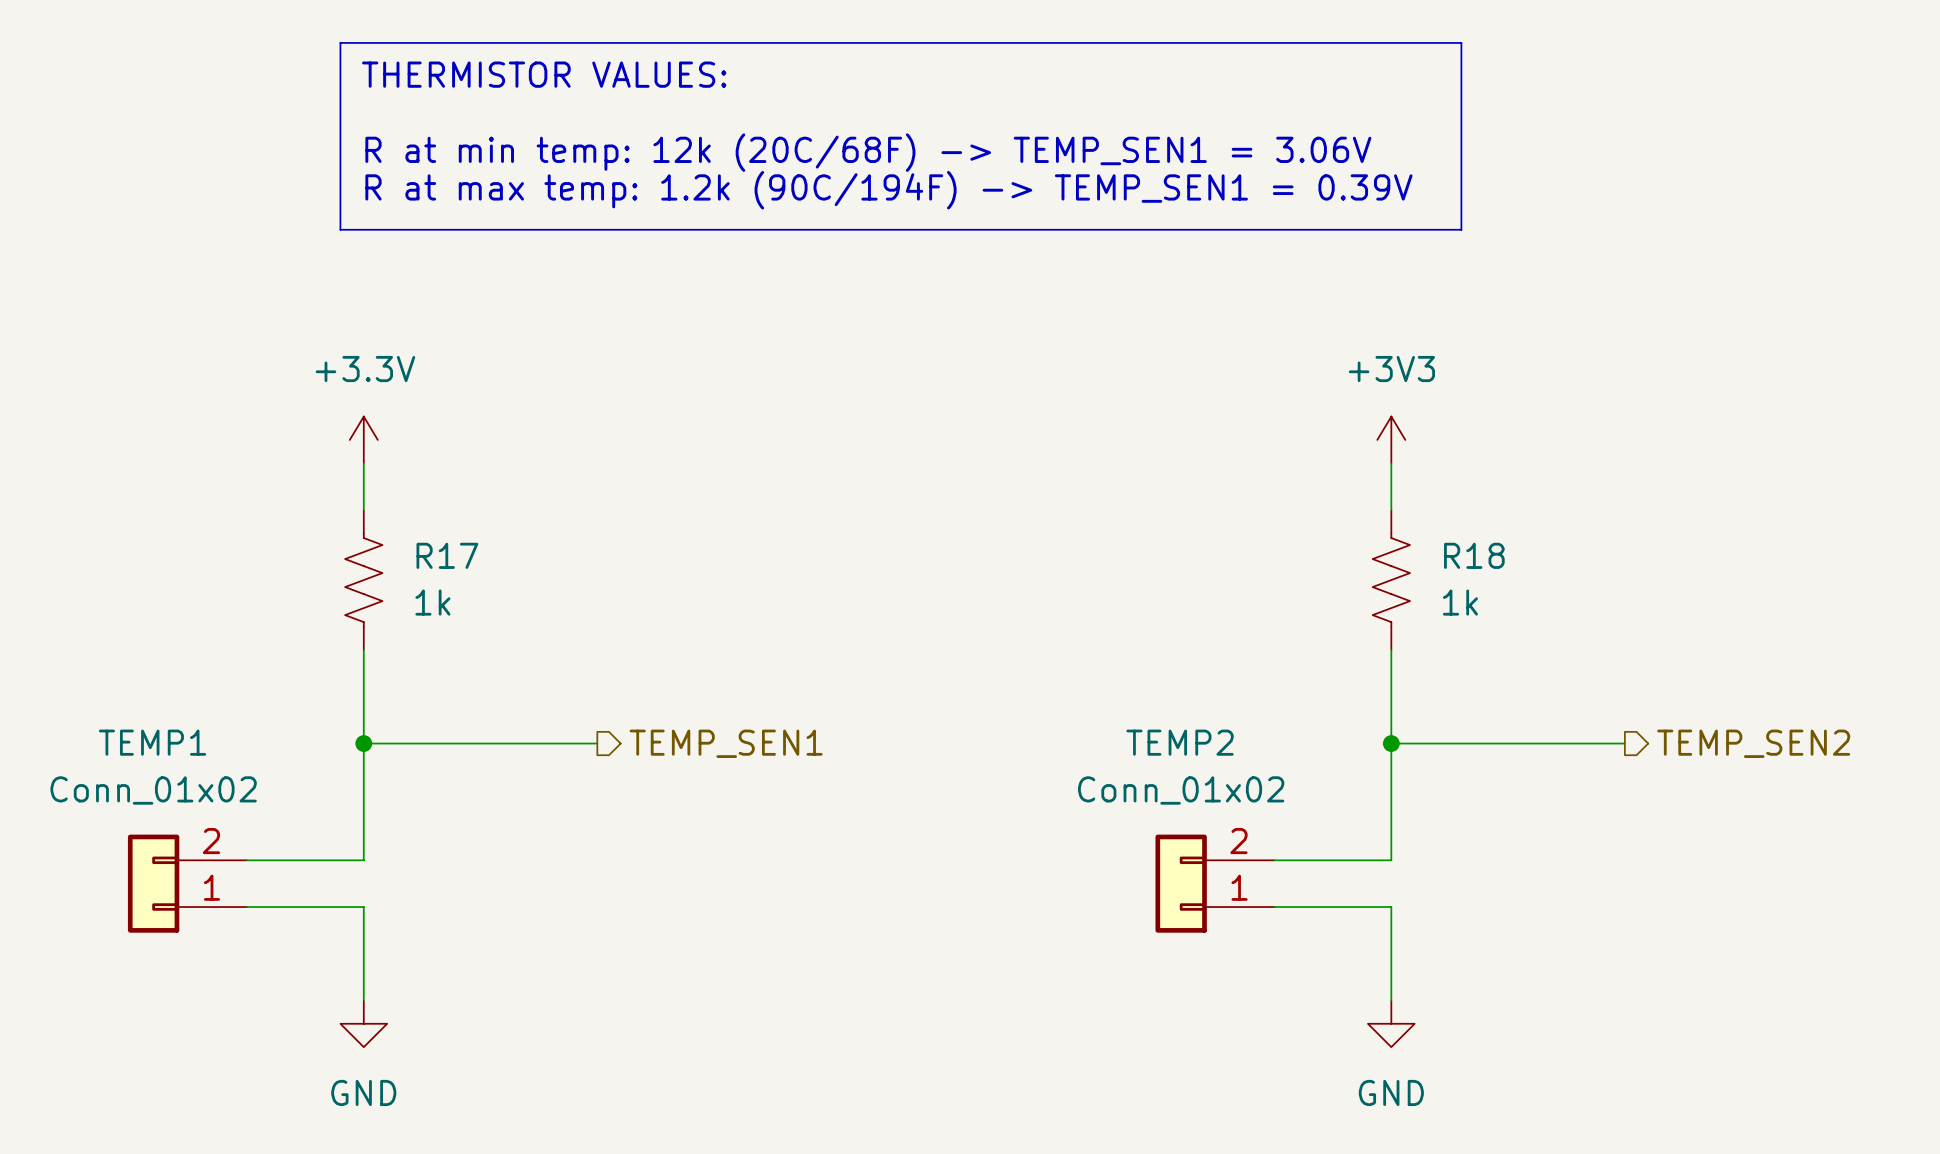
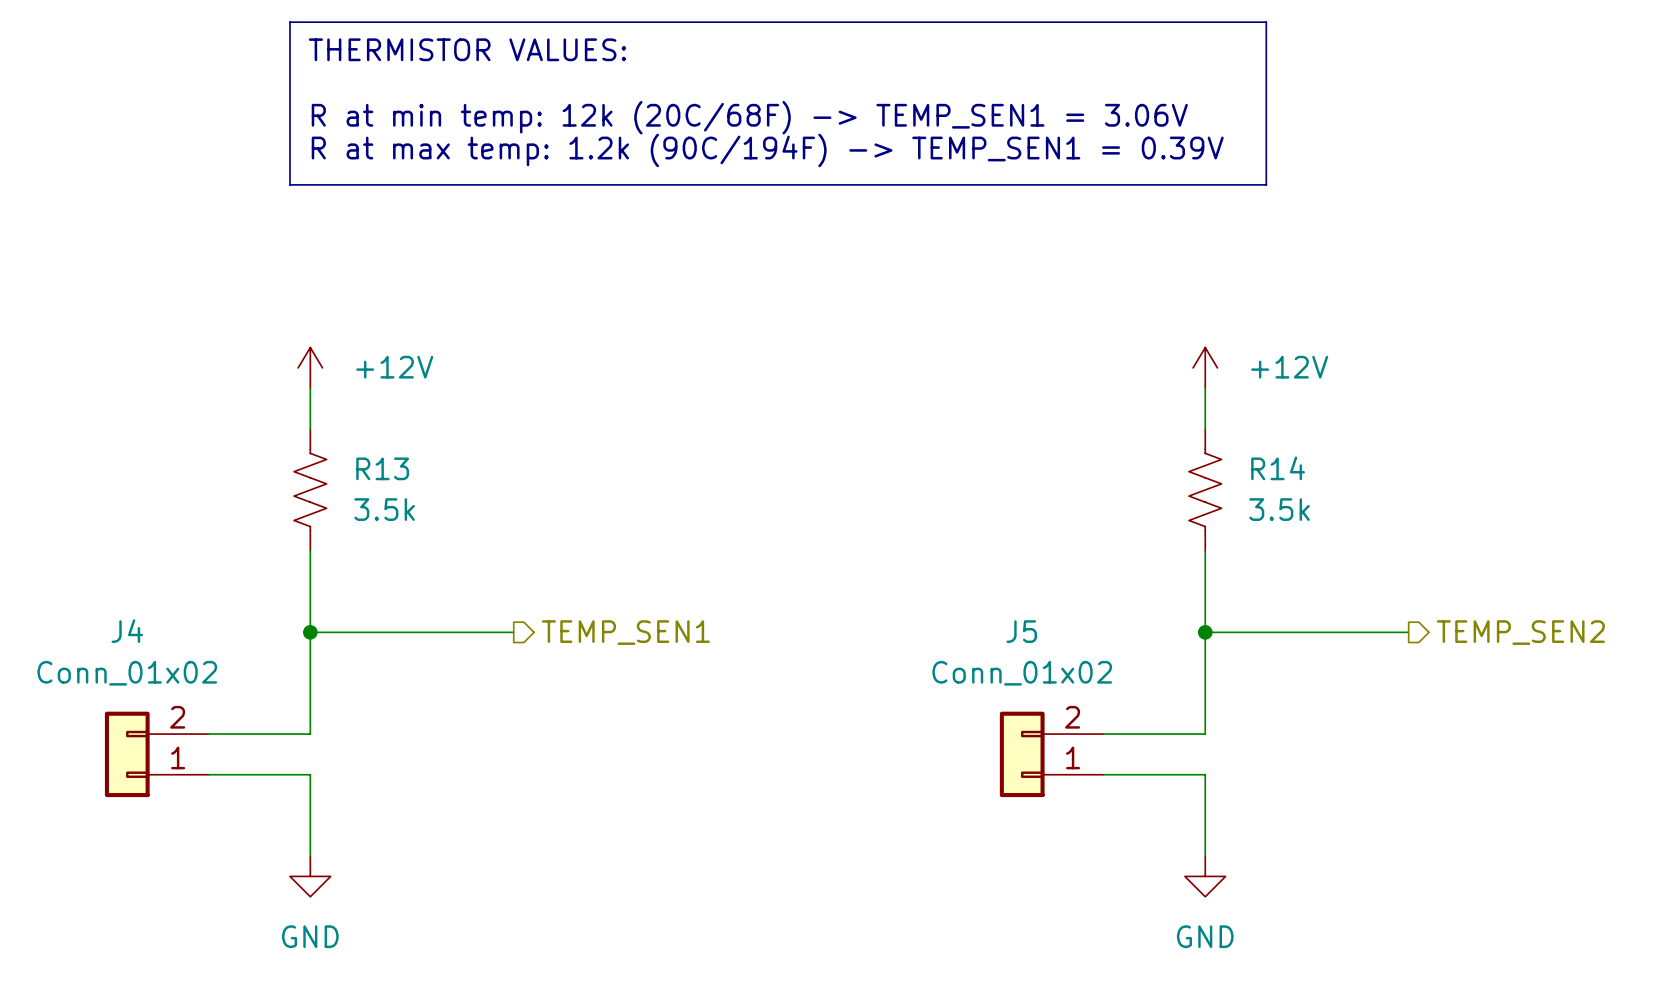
power symbol: +3.3V (363, 439) -> +12V (310, 367)
power symbol: +3V3 (1391, 439) -> +12V (1205, 367)
R17 name: R17 (447, 555) -> R13 (382, 468)
R18 name: R18 (1474, 555) -> R14 (1278, 468)
R17 value: 1k (432, 602) -> 3.5k (384, 509)
R18 value: 1k (1460, 602) -> 3.5k (1279, 509)
TEMP1 name: TEMP1 (152, 742) -> J4 (127, 631)
TEMP2 name: TEMP2 (1180, 742) -> J5 (1021, 631)

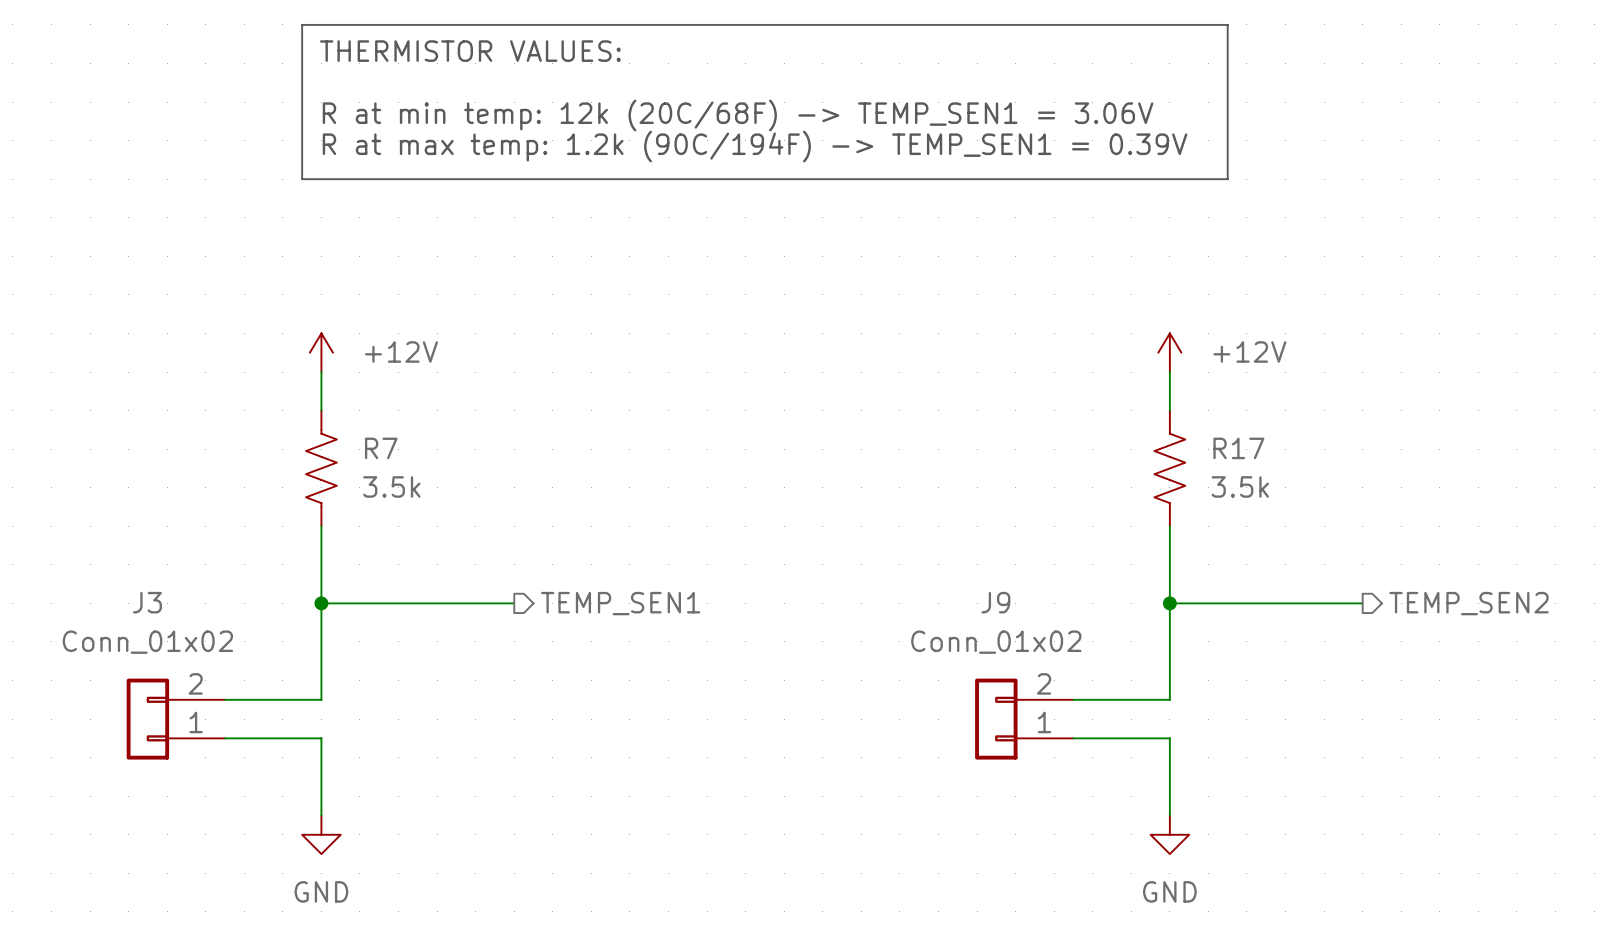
R13 name: R13 (382, 468) -> R7 (381, 448)
R14 name: R14 (1278, 468) -> R17 (1238, 448)
J4 name: J4 (127, 631) -> J3 (147, 602)
J5 name: J5 (1021, 631) -> J9 (995, 602)

